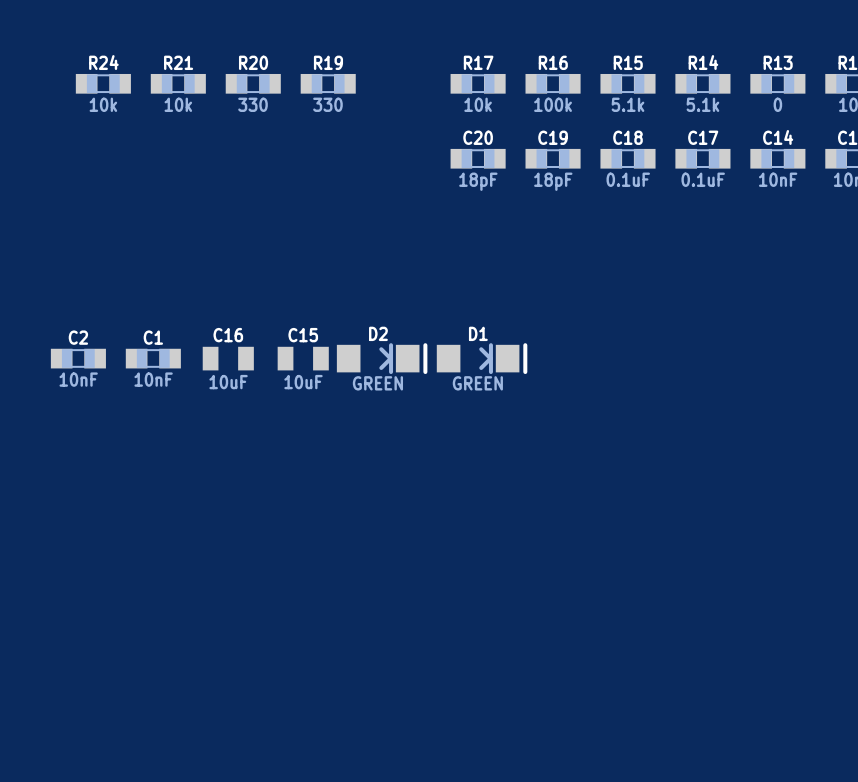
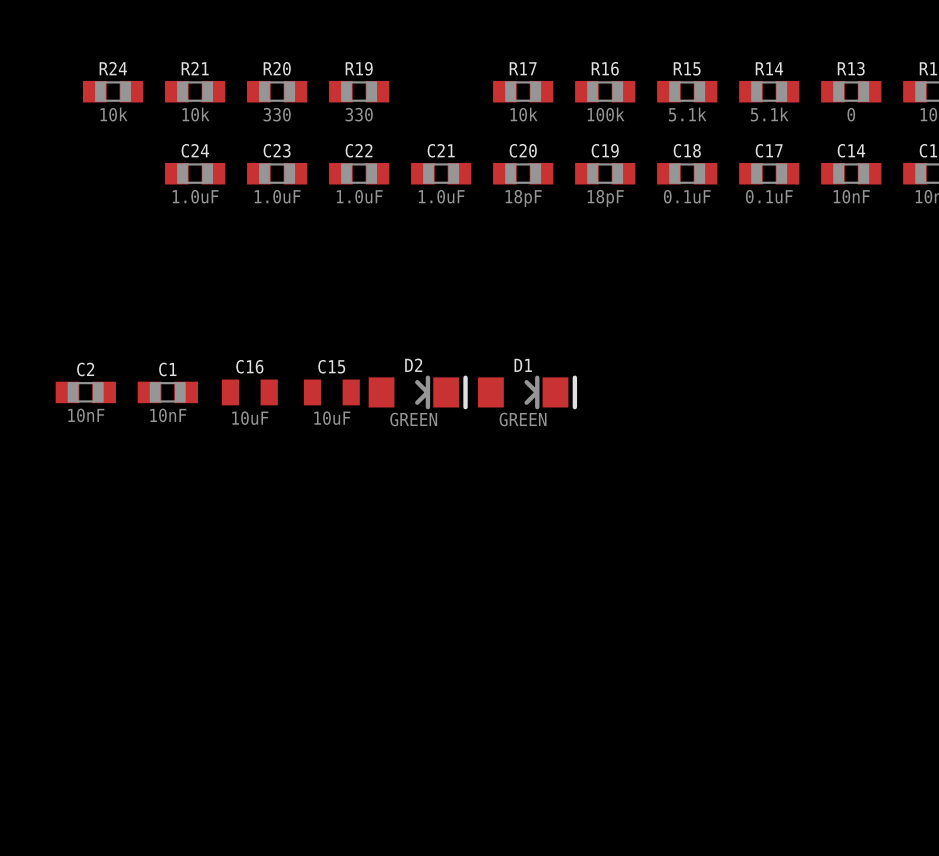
C24: none -> 1.0uF (195, 173)
C23: none -> 1.0uF (277, 173)
C22: none -> 1.0uF (359, 173)
C21: none -> 1.0uF (441, 173)

